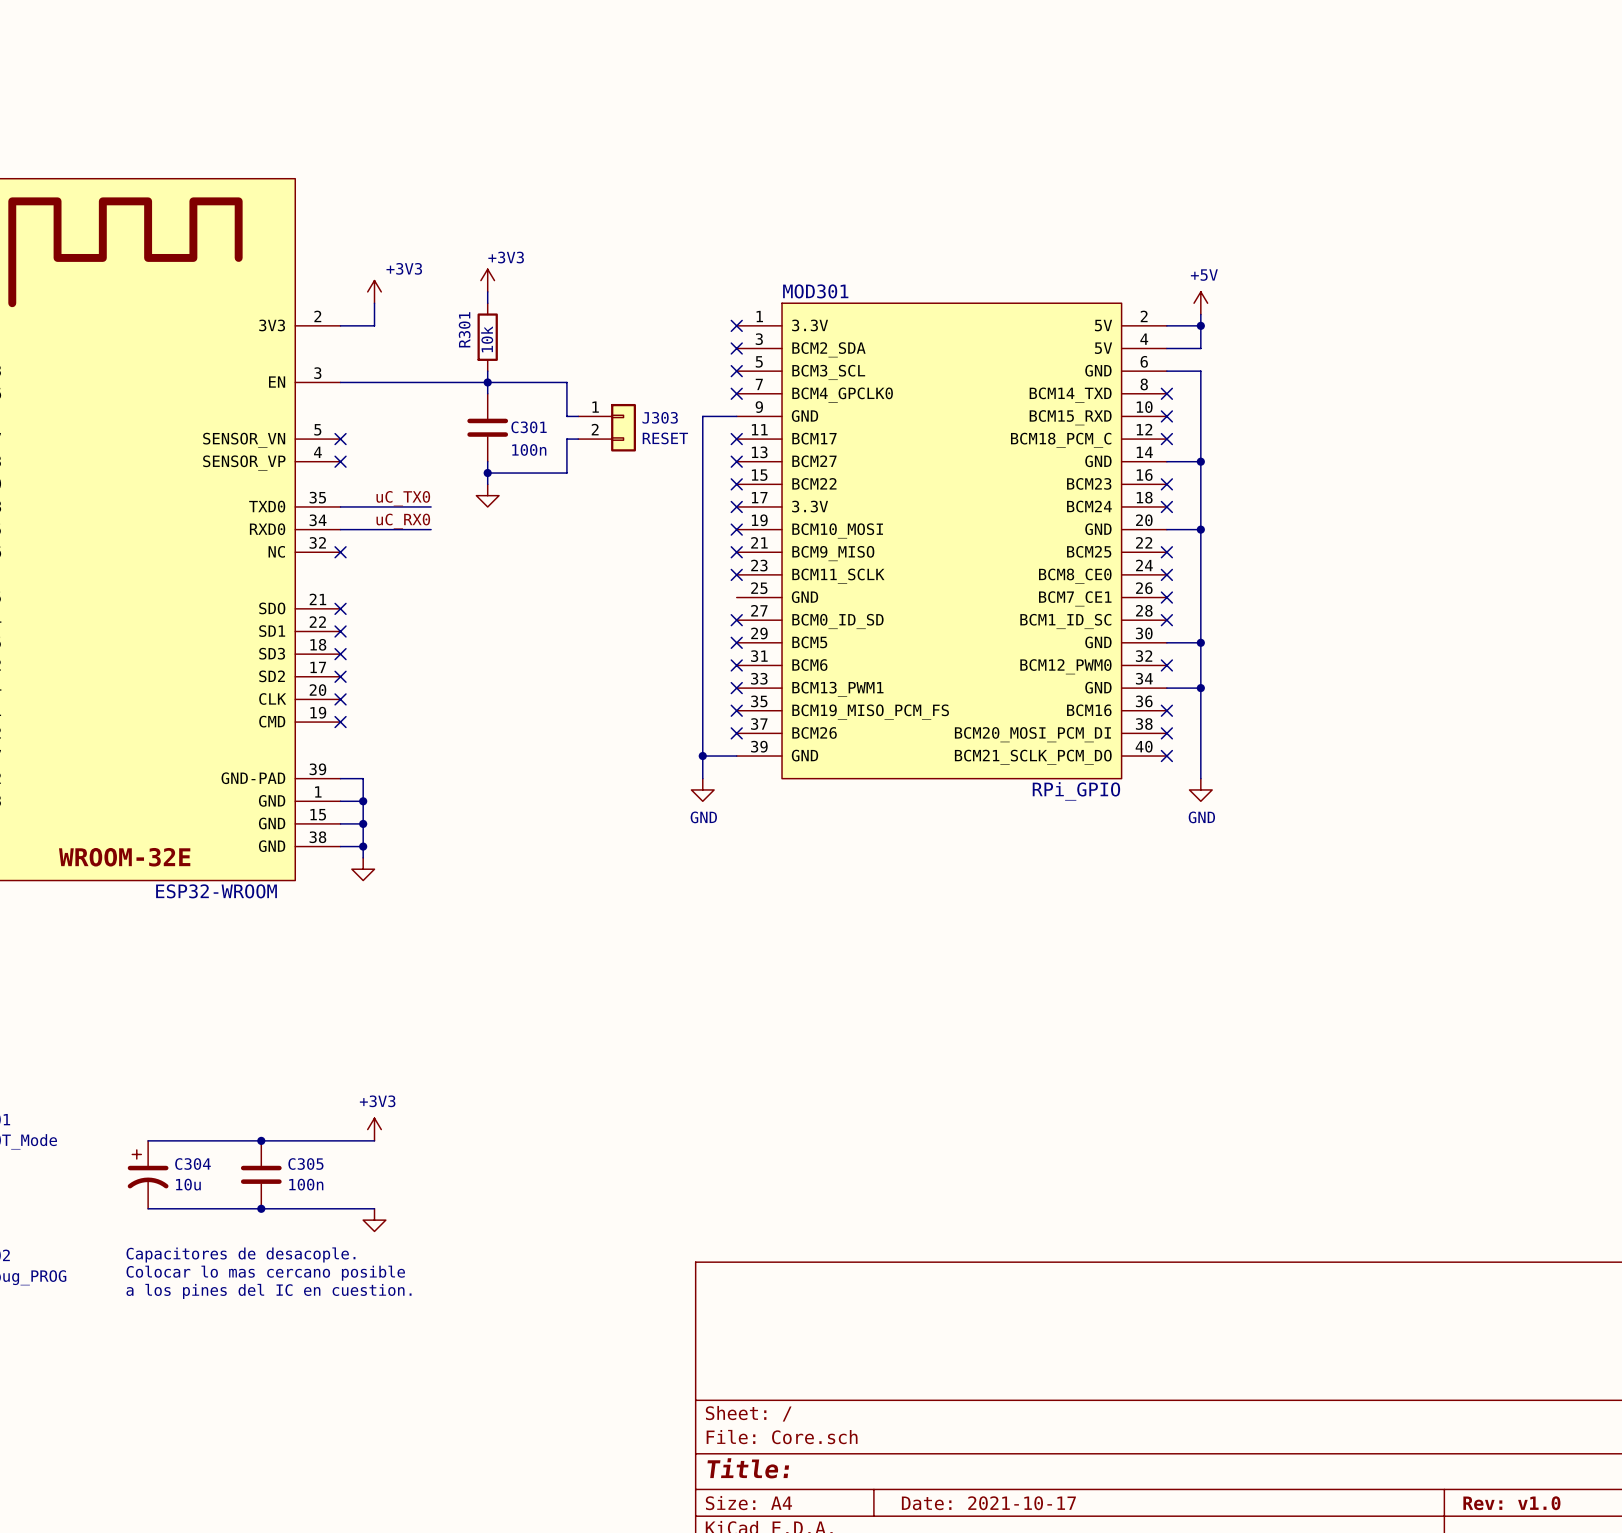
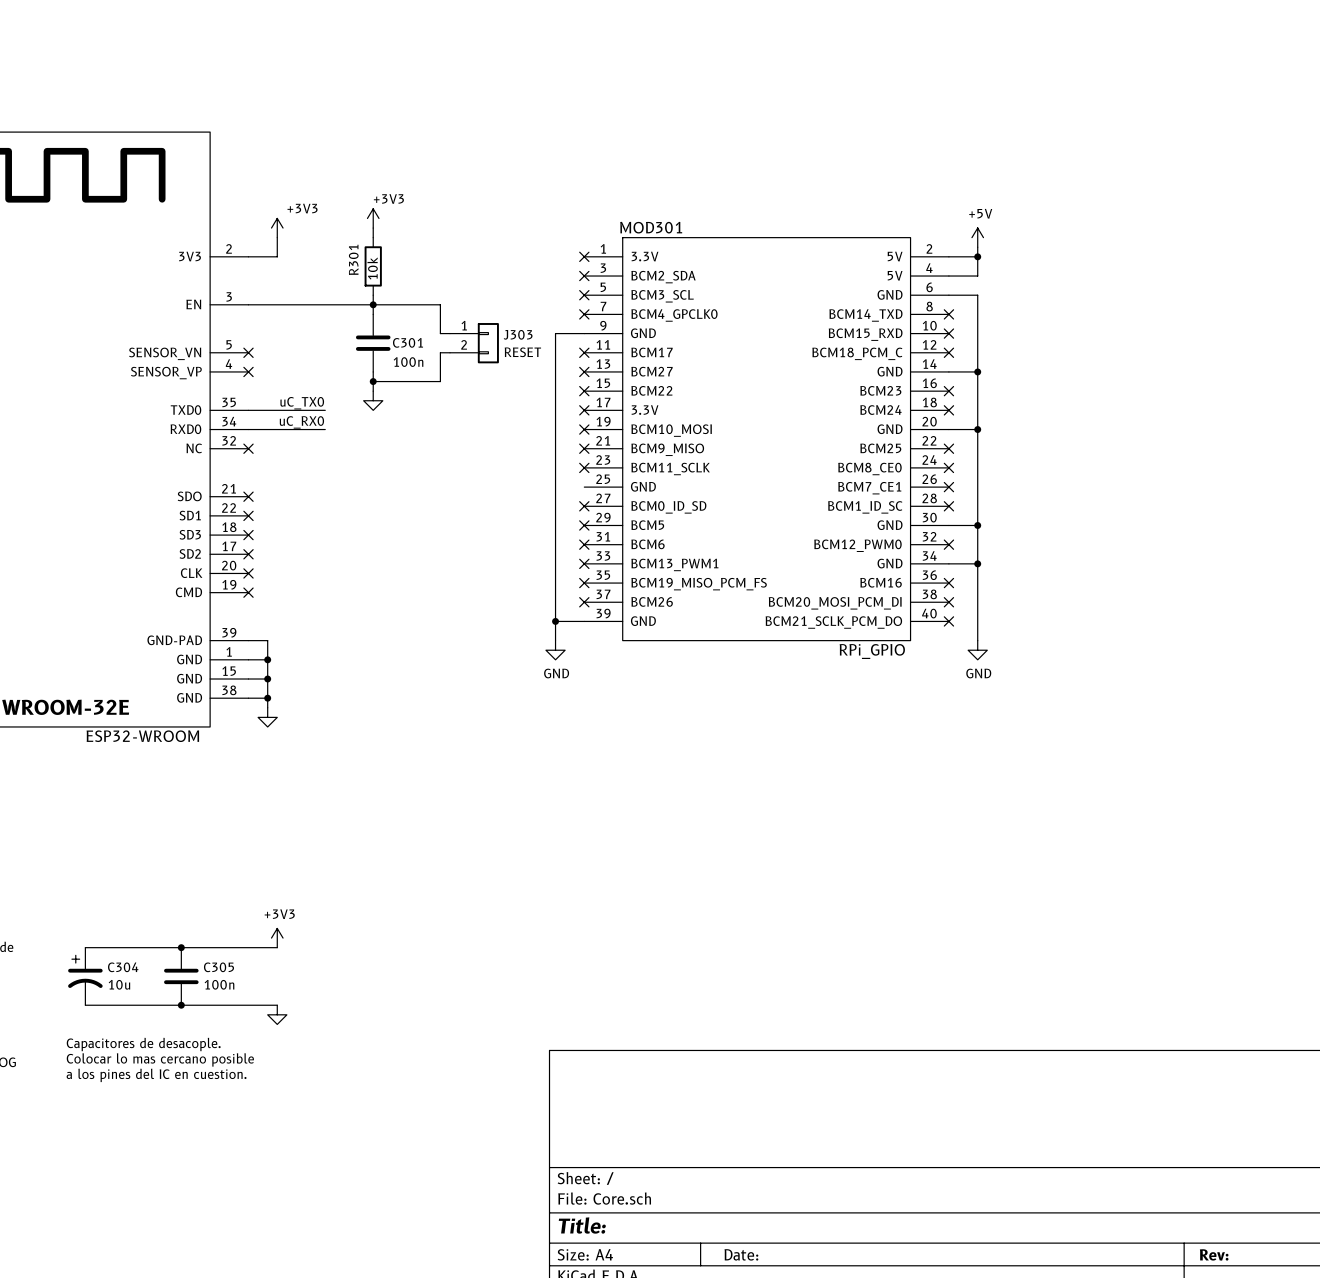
title block: Date: 2021-10-17 (988, 1503) -> Date: (741, 1254)
title block: Rev: v1.0 (1511, 1503) -> Rev: (1214, 1254)

